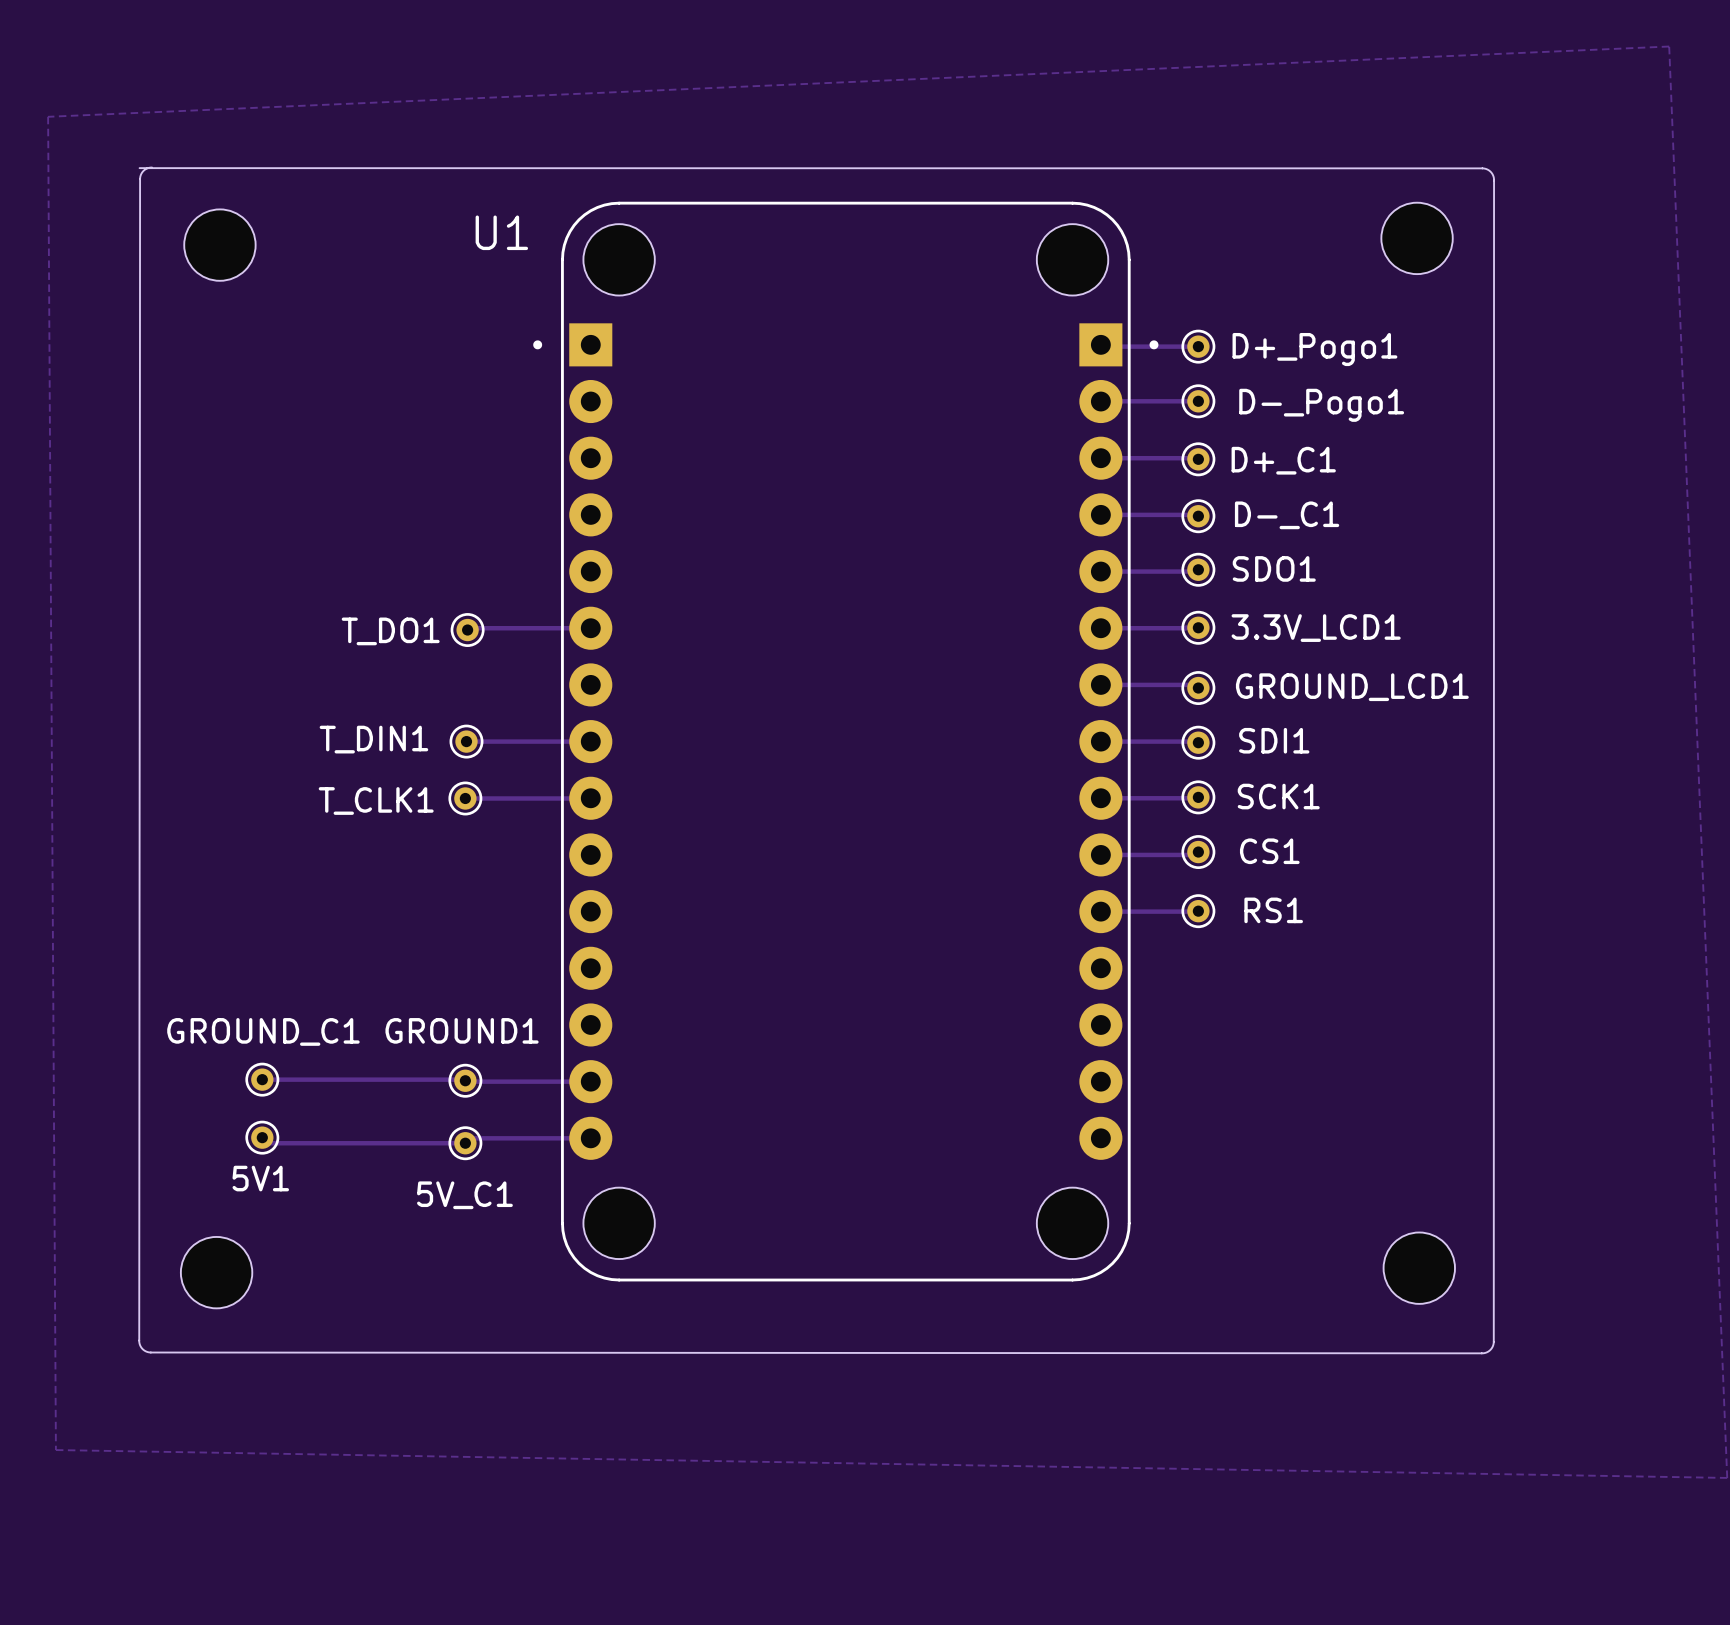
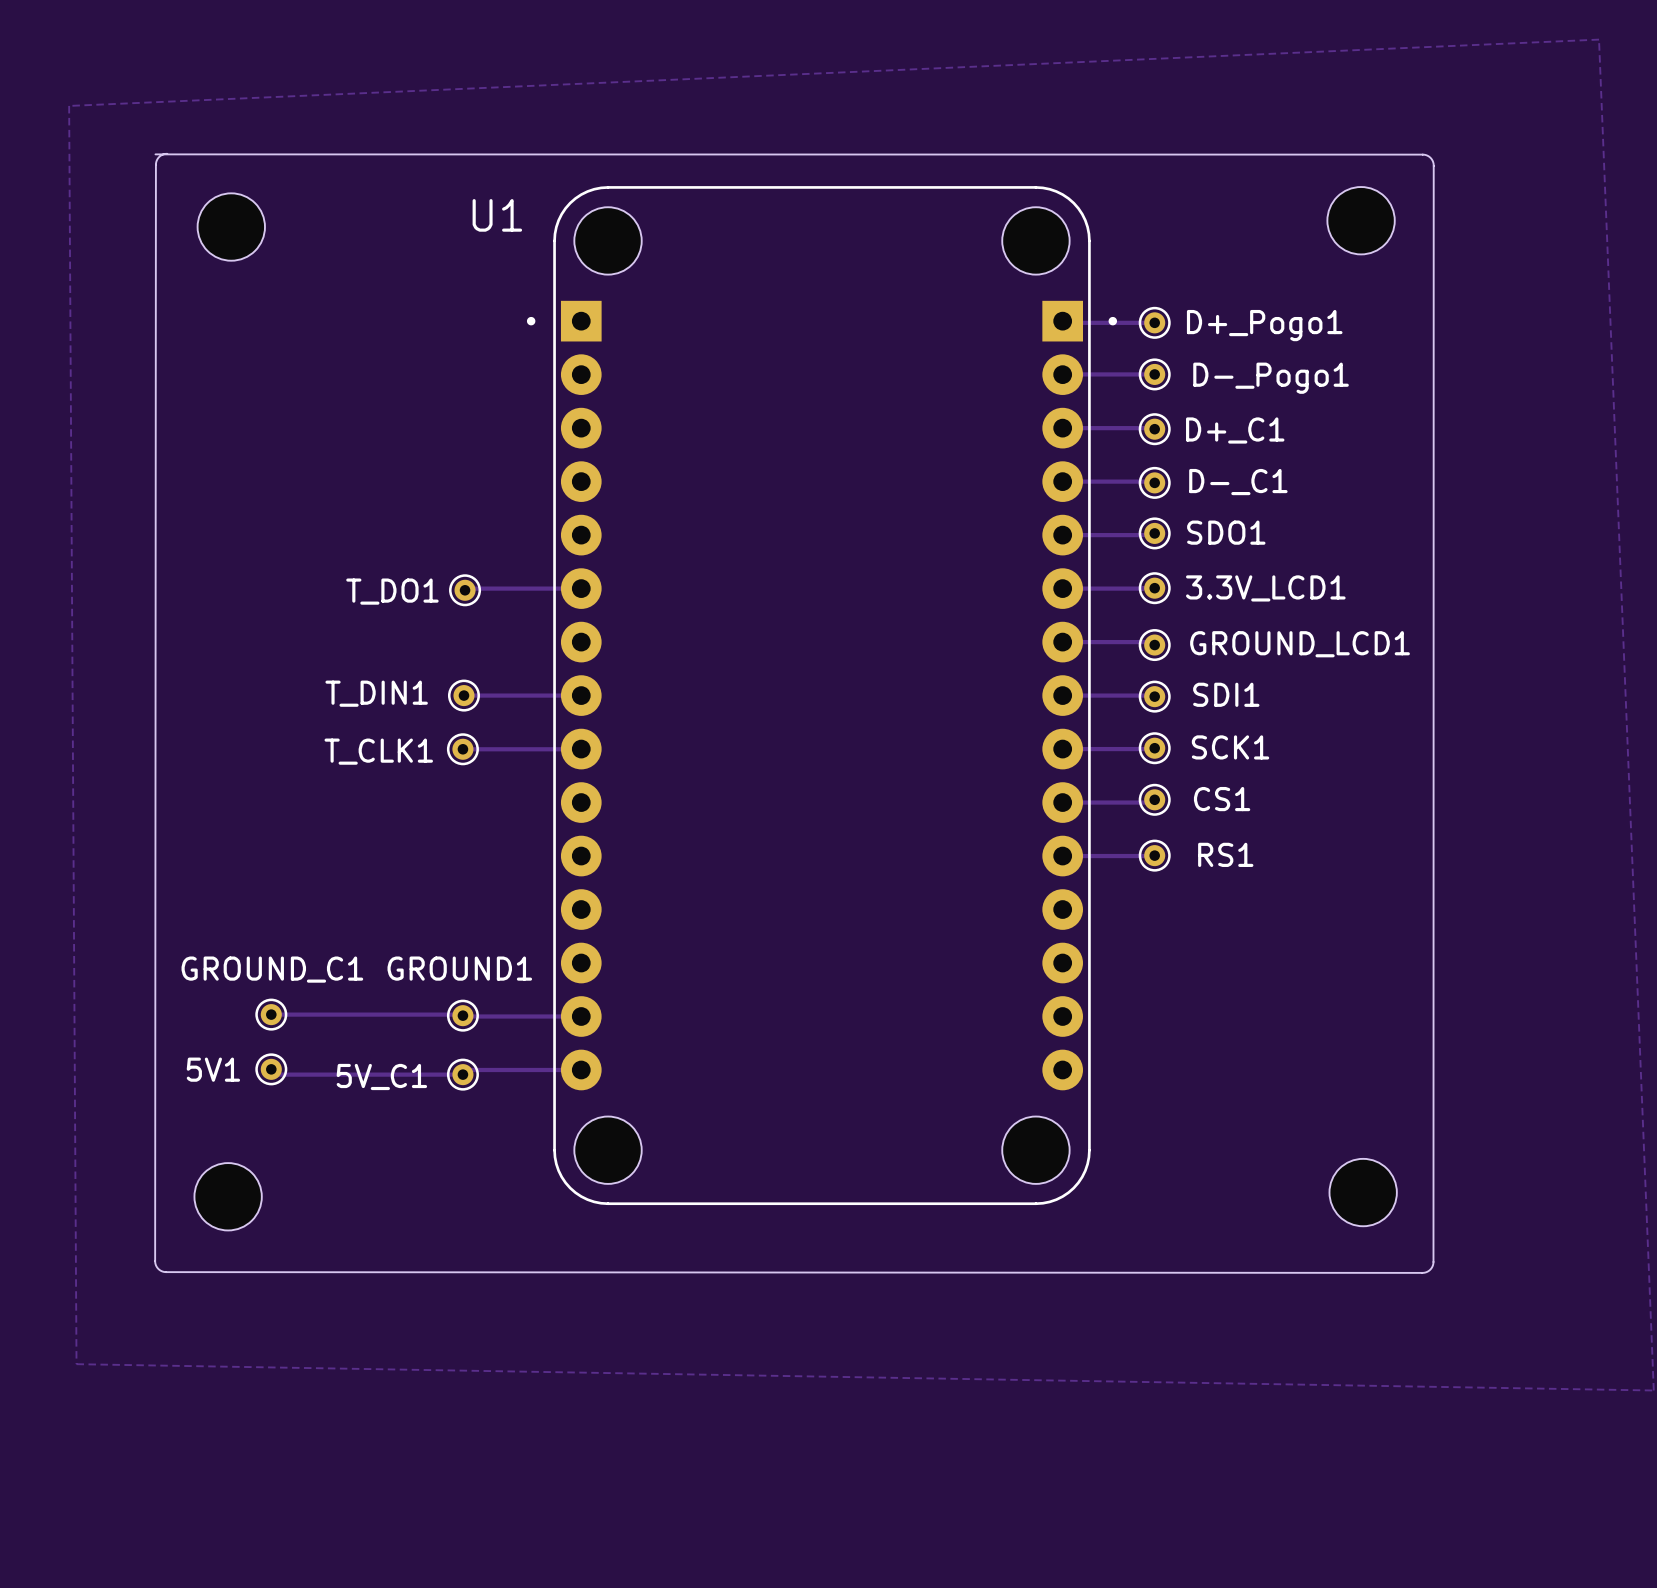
5V1 name position: 5V1 (260, 1178) -> 5V1 (213, 1069)
5V_C1 name position: 5V_C1 (464, 1195) -> 5V_C1 (381, 1076)

